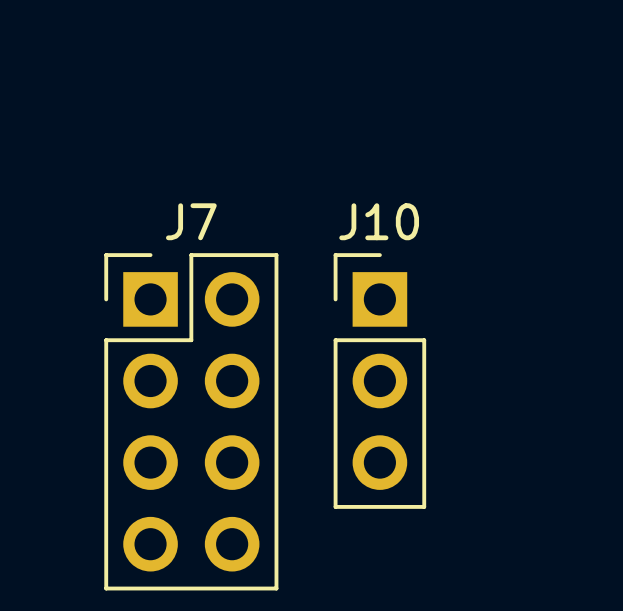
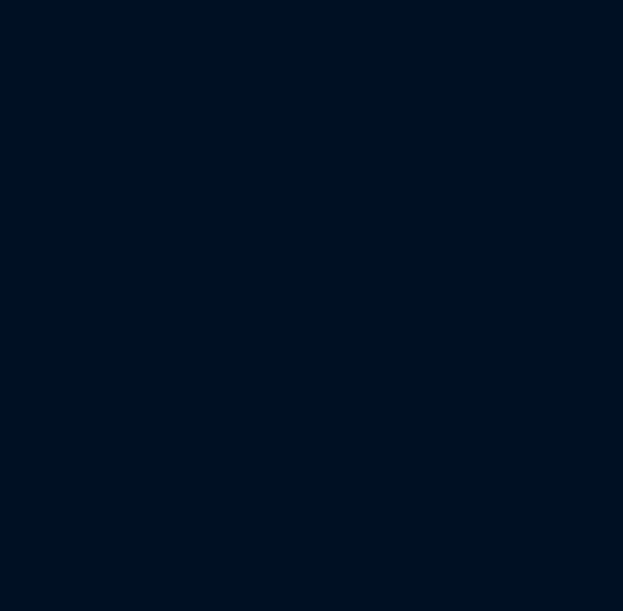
J10: (379, 381) -> none
J7: (191, 421) -> none

